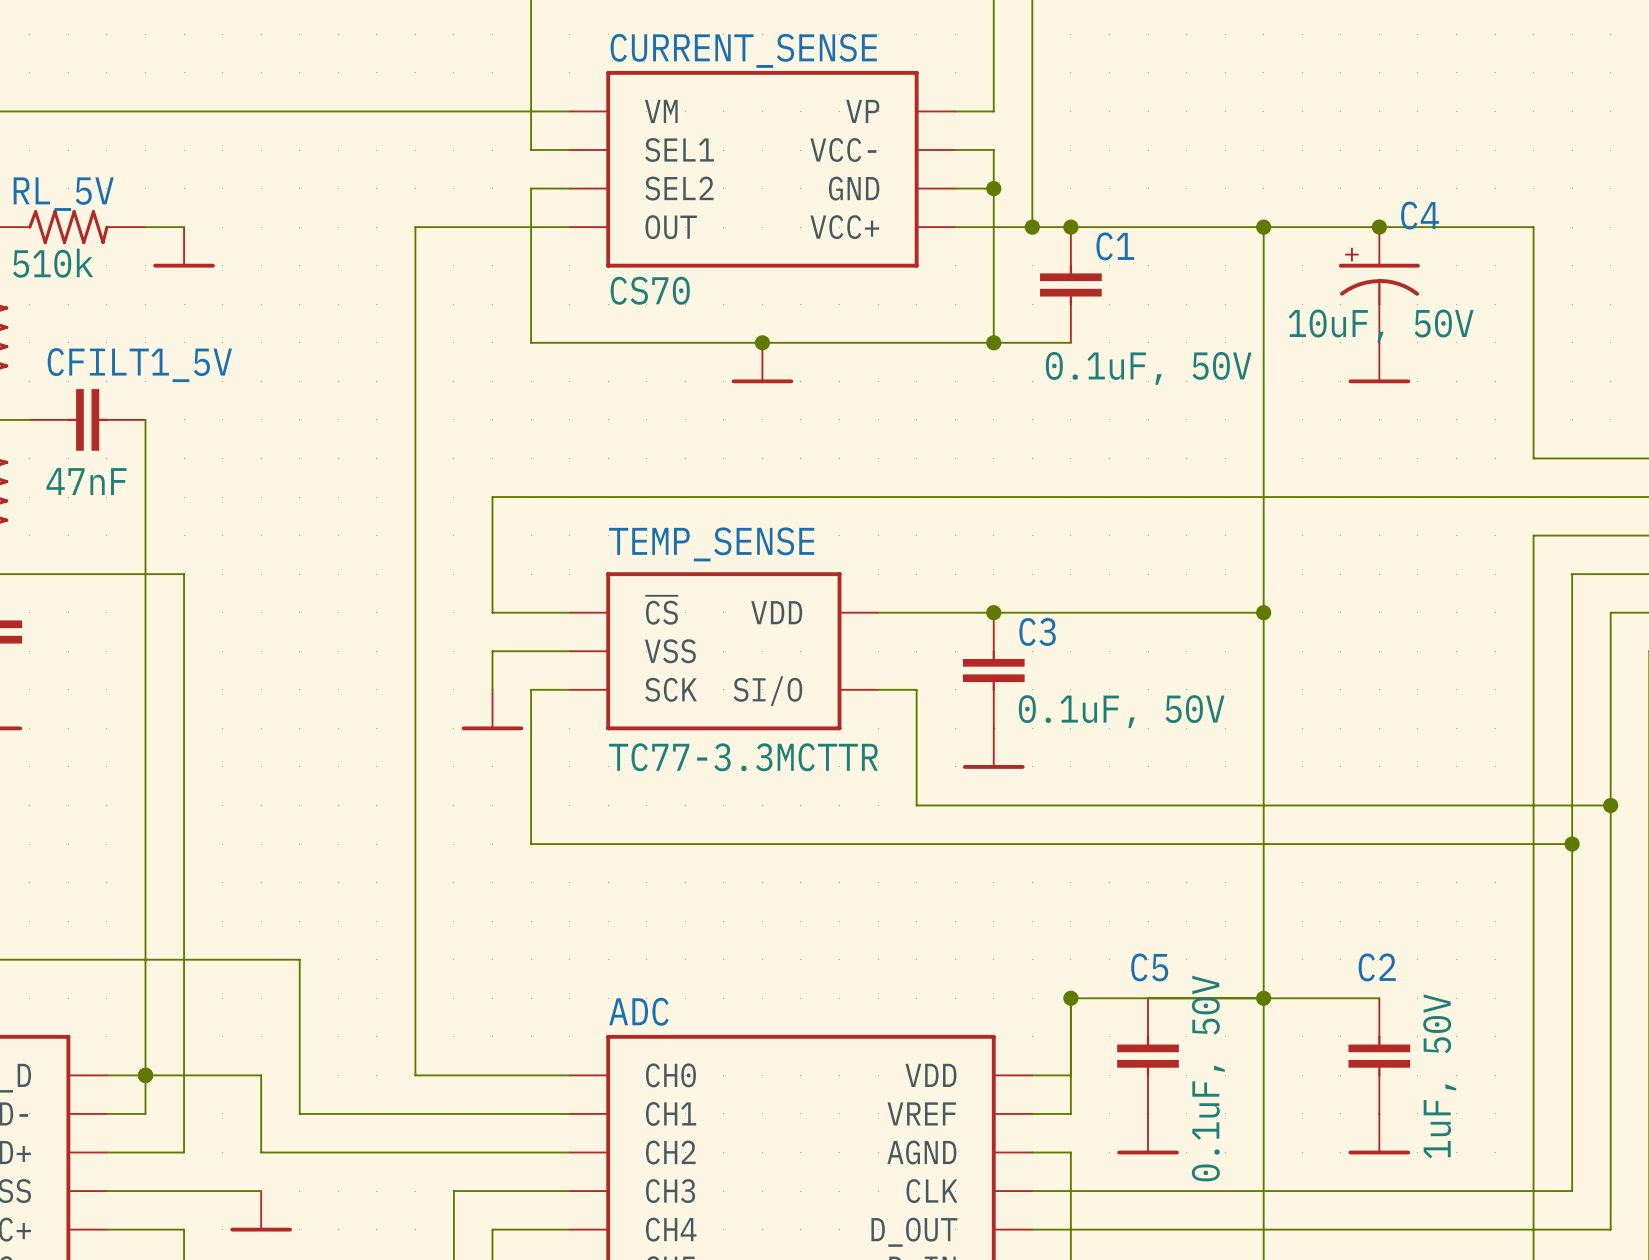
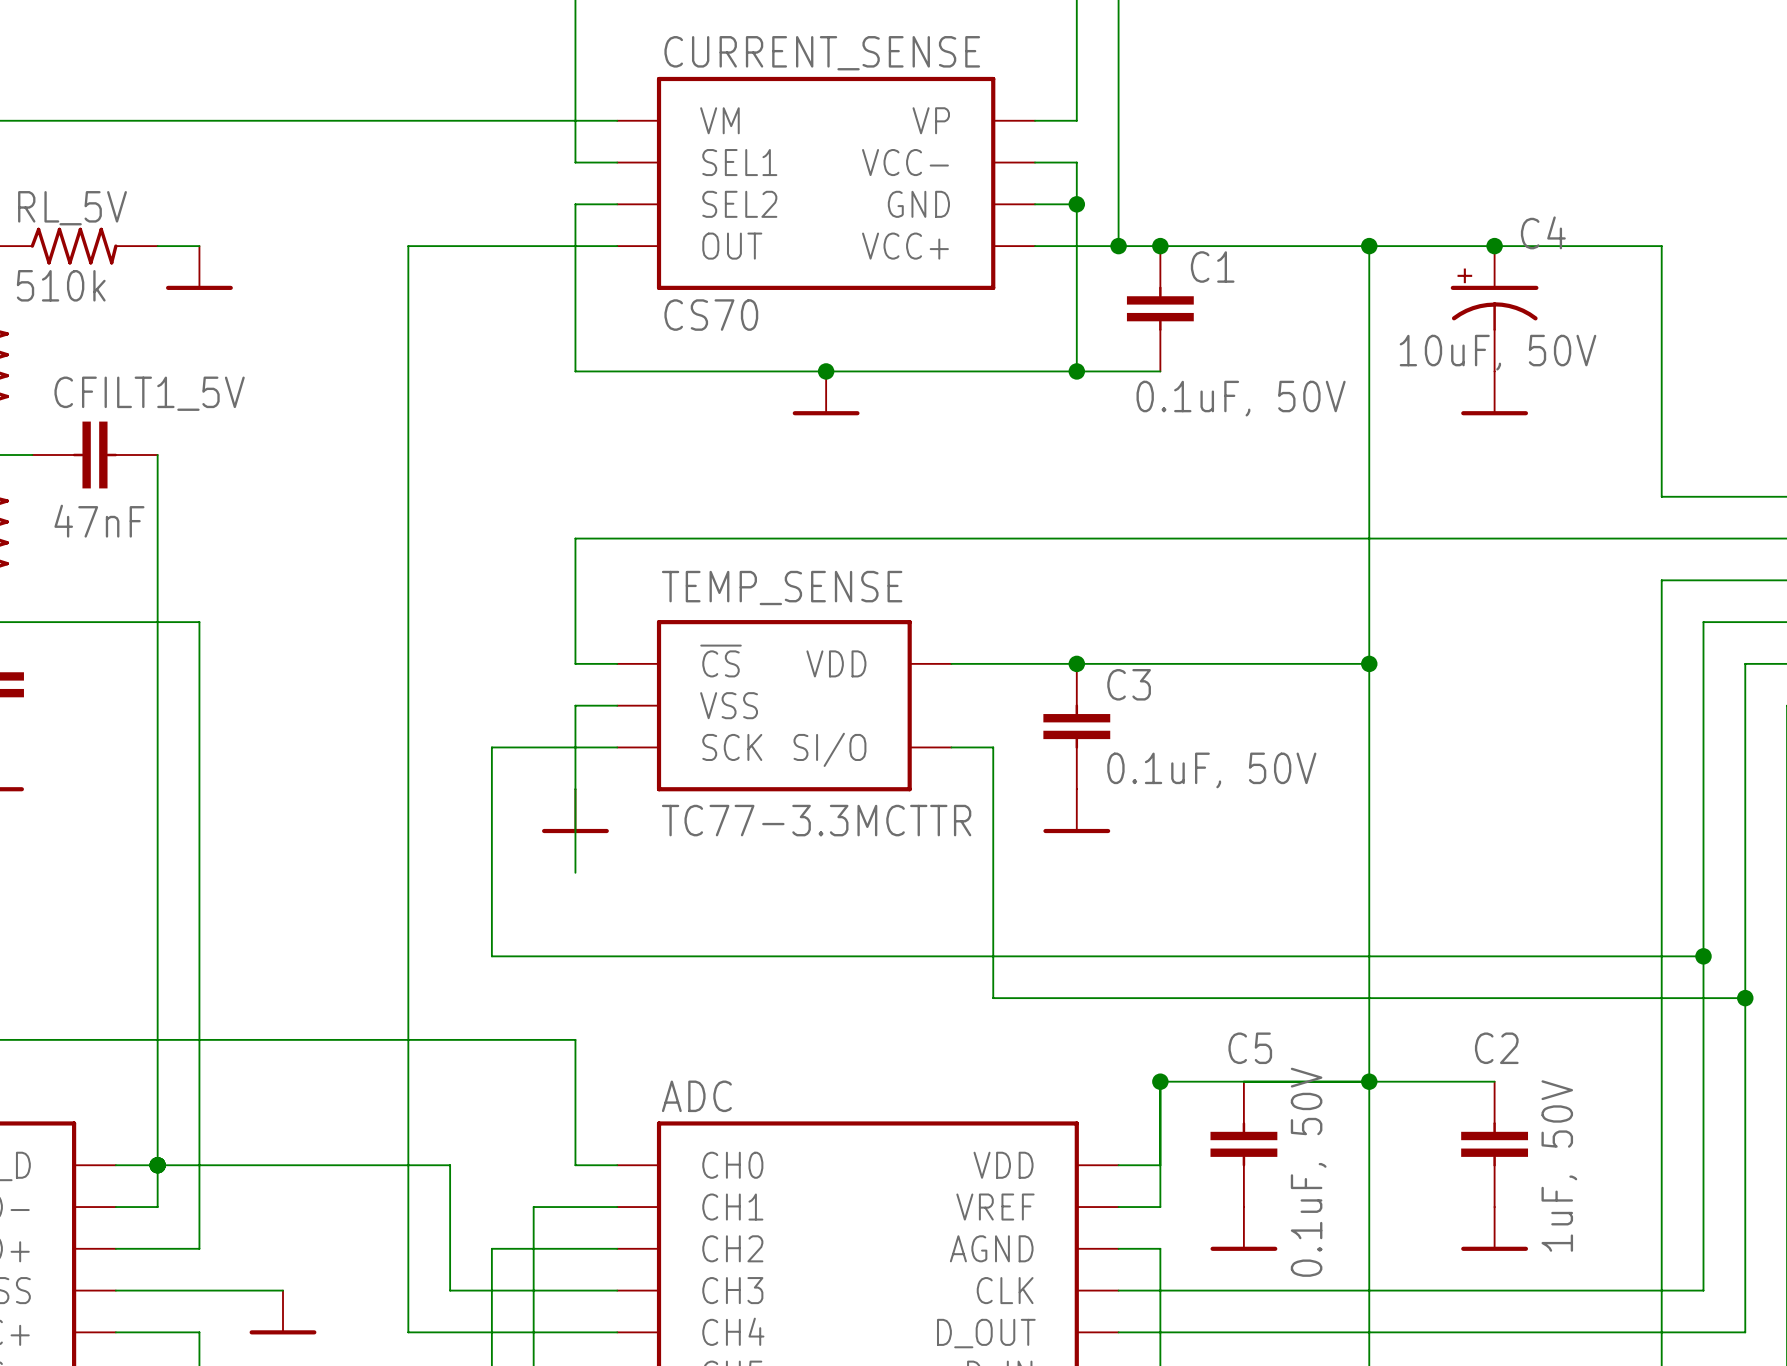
wire: (415, 227) (415, 1075) (531, 1075) -> (450, 246) (408, 246) (408, 1332) (533, 1332) (533, 1207)
wire: (531, 497) (492, 497) (492, 612) (531, 612) -> (575, 538) (575, 663)
wire: (531, 651) (492, 651) (492, 689) -> (575, 705) (575, 747) (491, 747) (491, 956) (1703, 956)
power symbol position: (492, 710) -> (575, 811)
wire: (531, 805) (531, 844) (1572, 844) -> none
wire: (916, 805) (1610, 805) -> (993, 872) (993, 998) (1745, 998)
junction: (1610, 805) -> none
junction position: (1572, 844) -> (1703, 956)
junction: none -> (1745, 998)
wire: (299, 959) (299, 1113) (492, 1113) -> (324, 1039) (575, 1039) (575, 1165)
wire: (261, 1075) (261, 1152) (453, 1152) -> (283, 1165) (450, 1165) (450, 1290) (491, 1290) (491, 1248)

